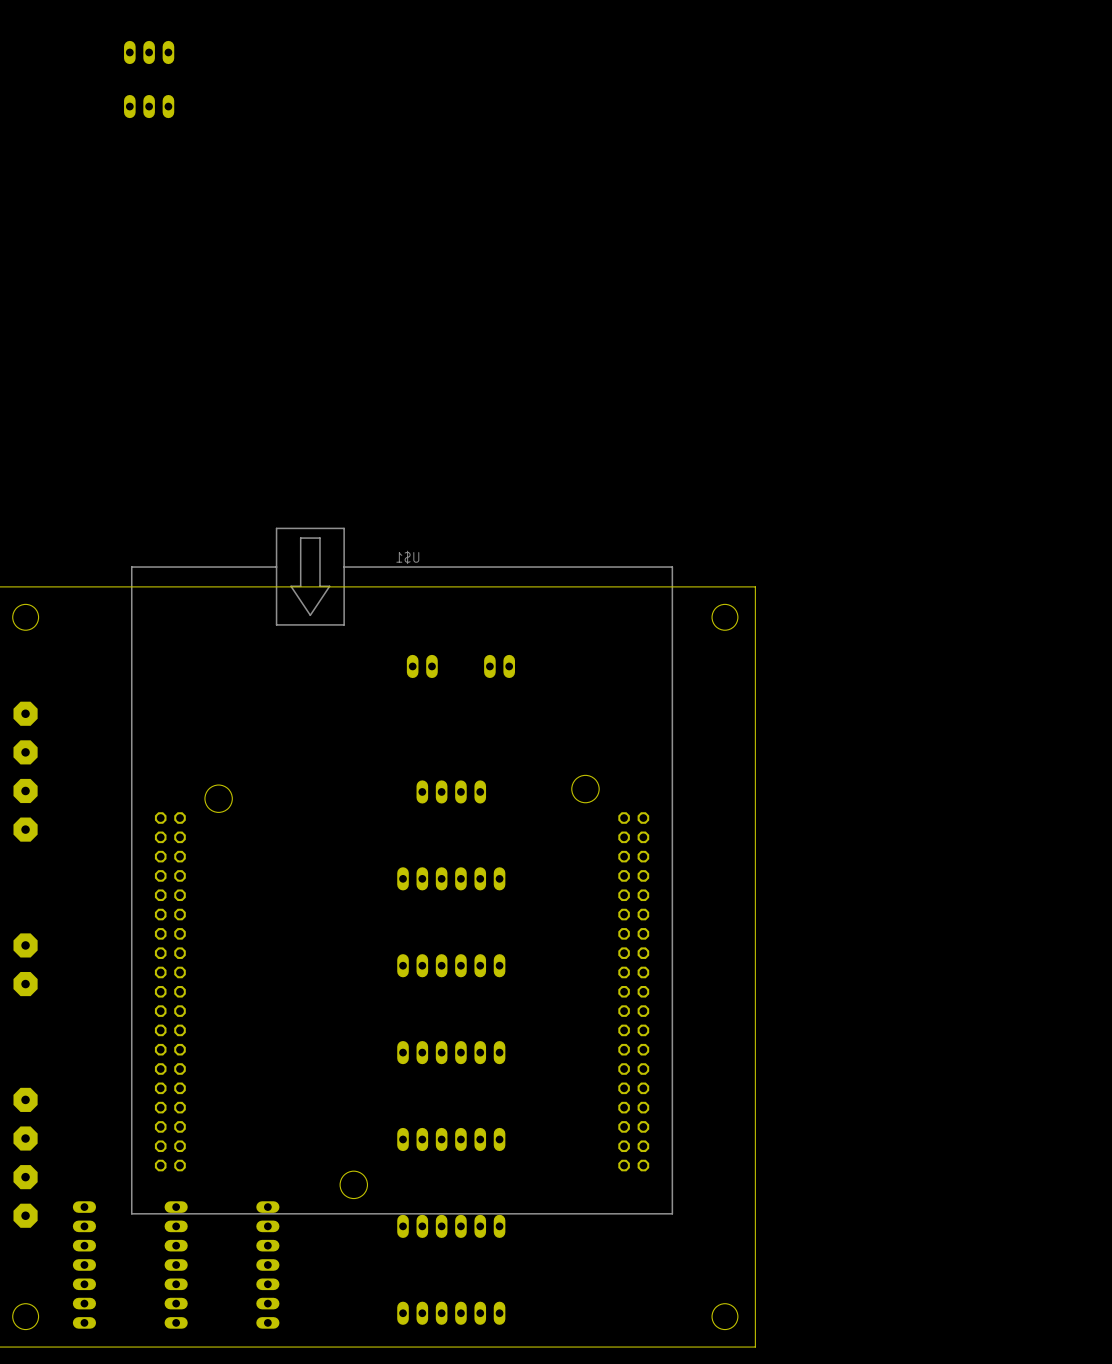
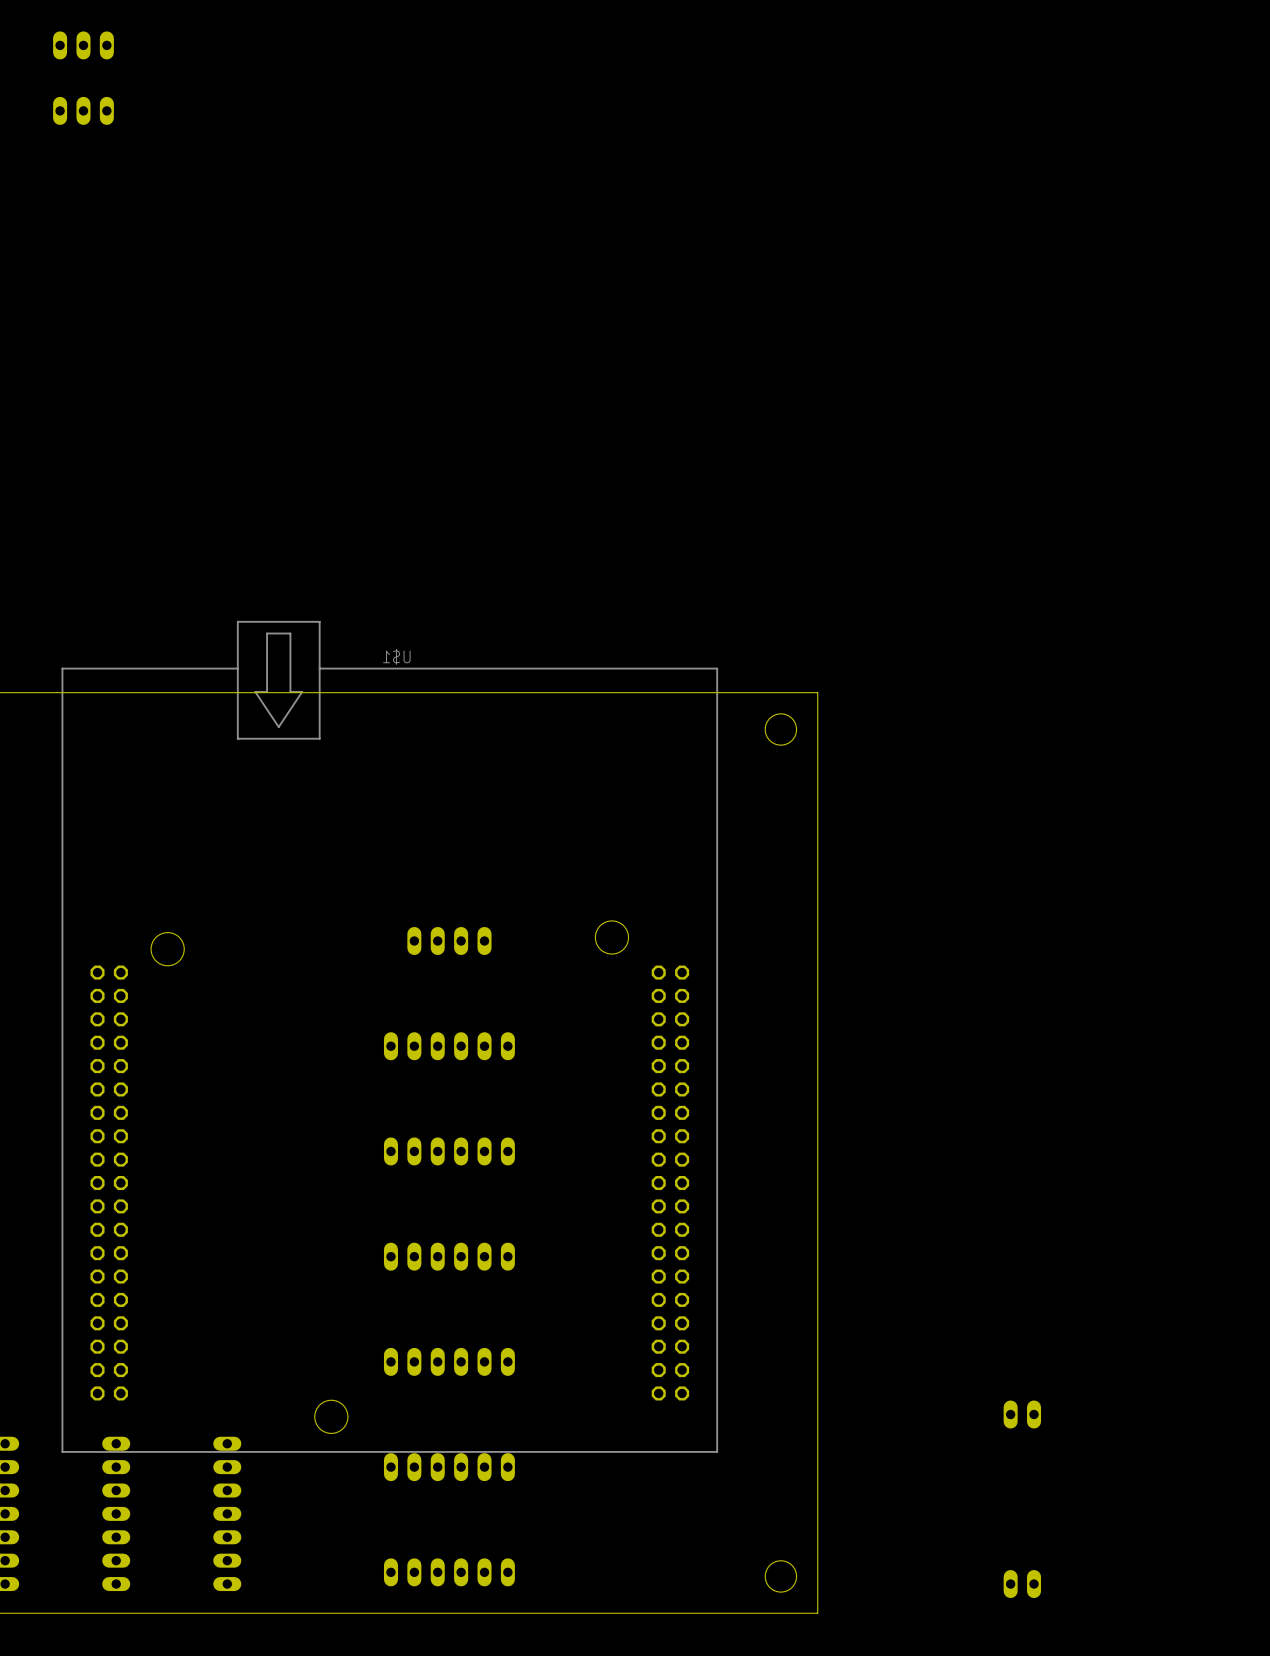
part: (422, 666) -> none
part: (499, 666) -> none
part: none -> (1022, 1414)
part: none -> (1022, 1584)

